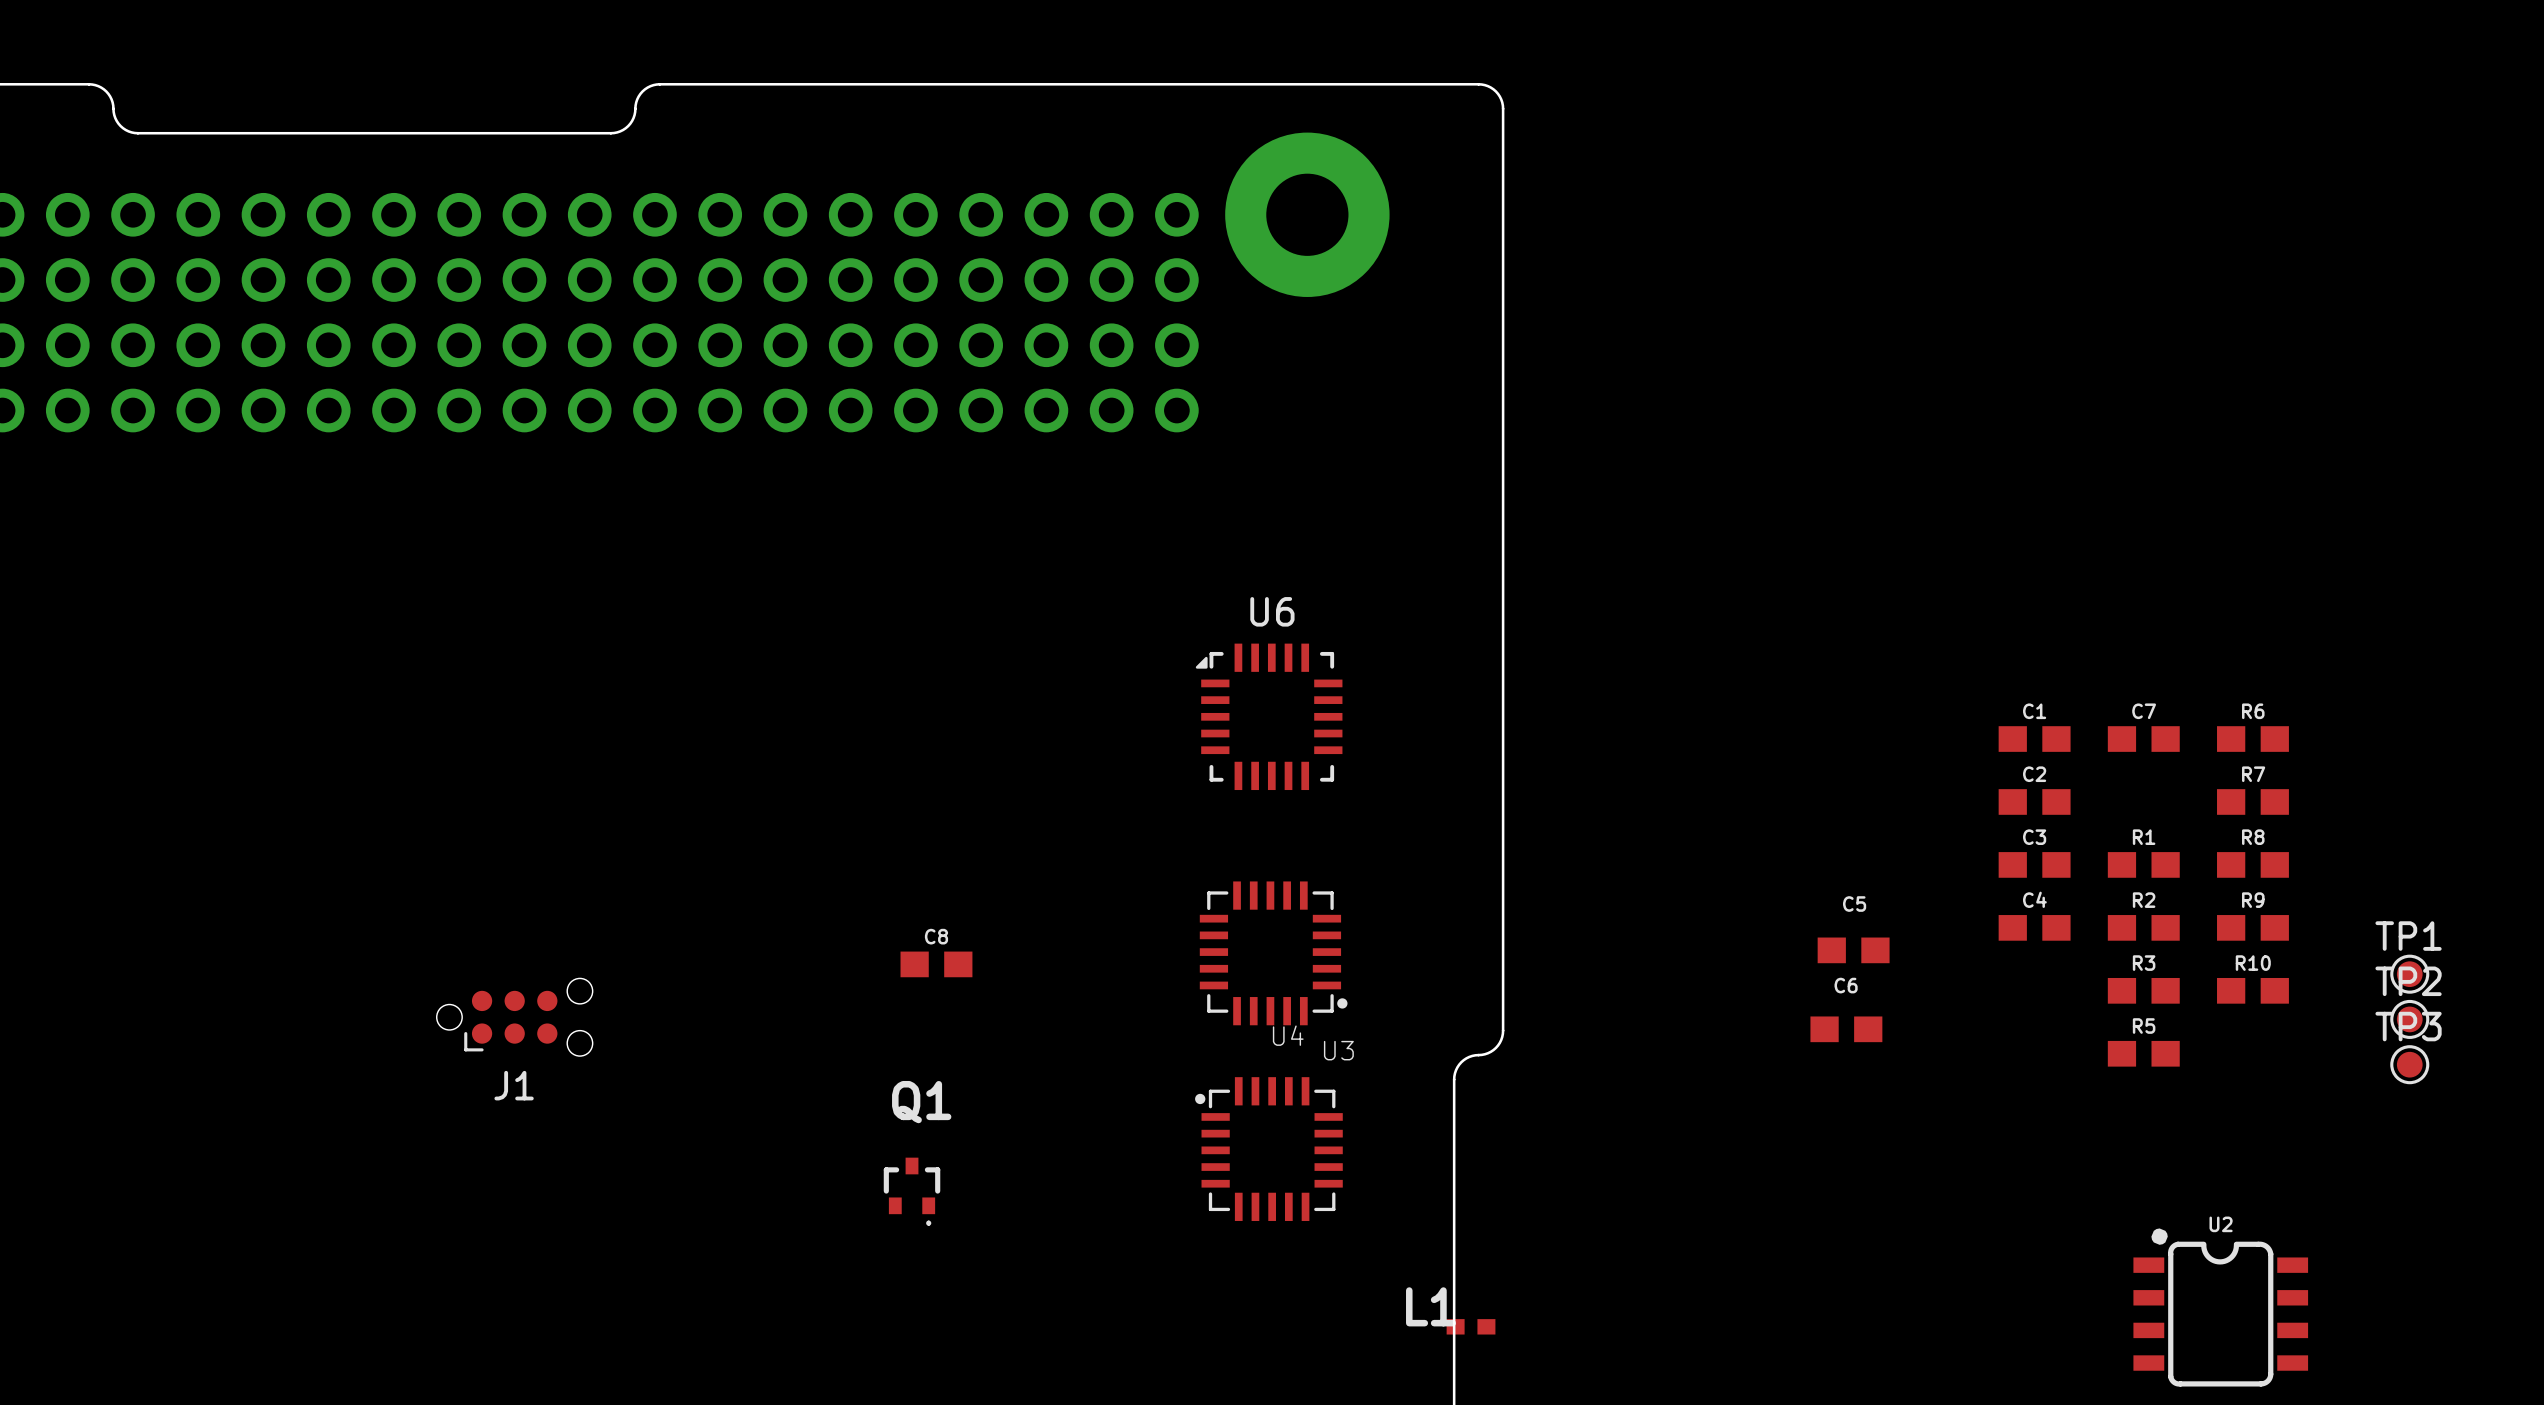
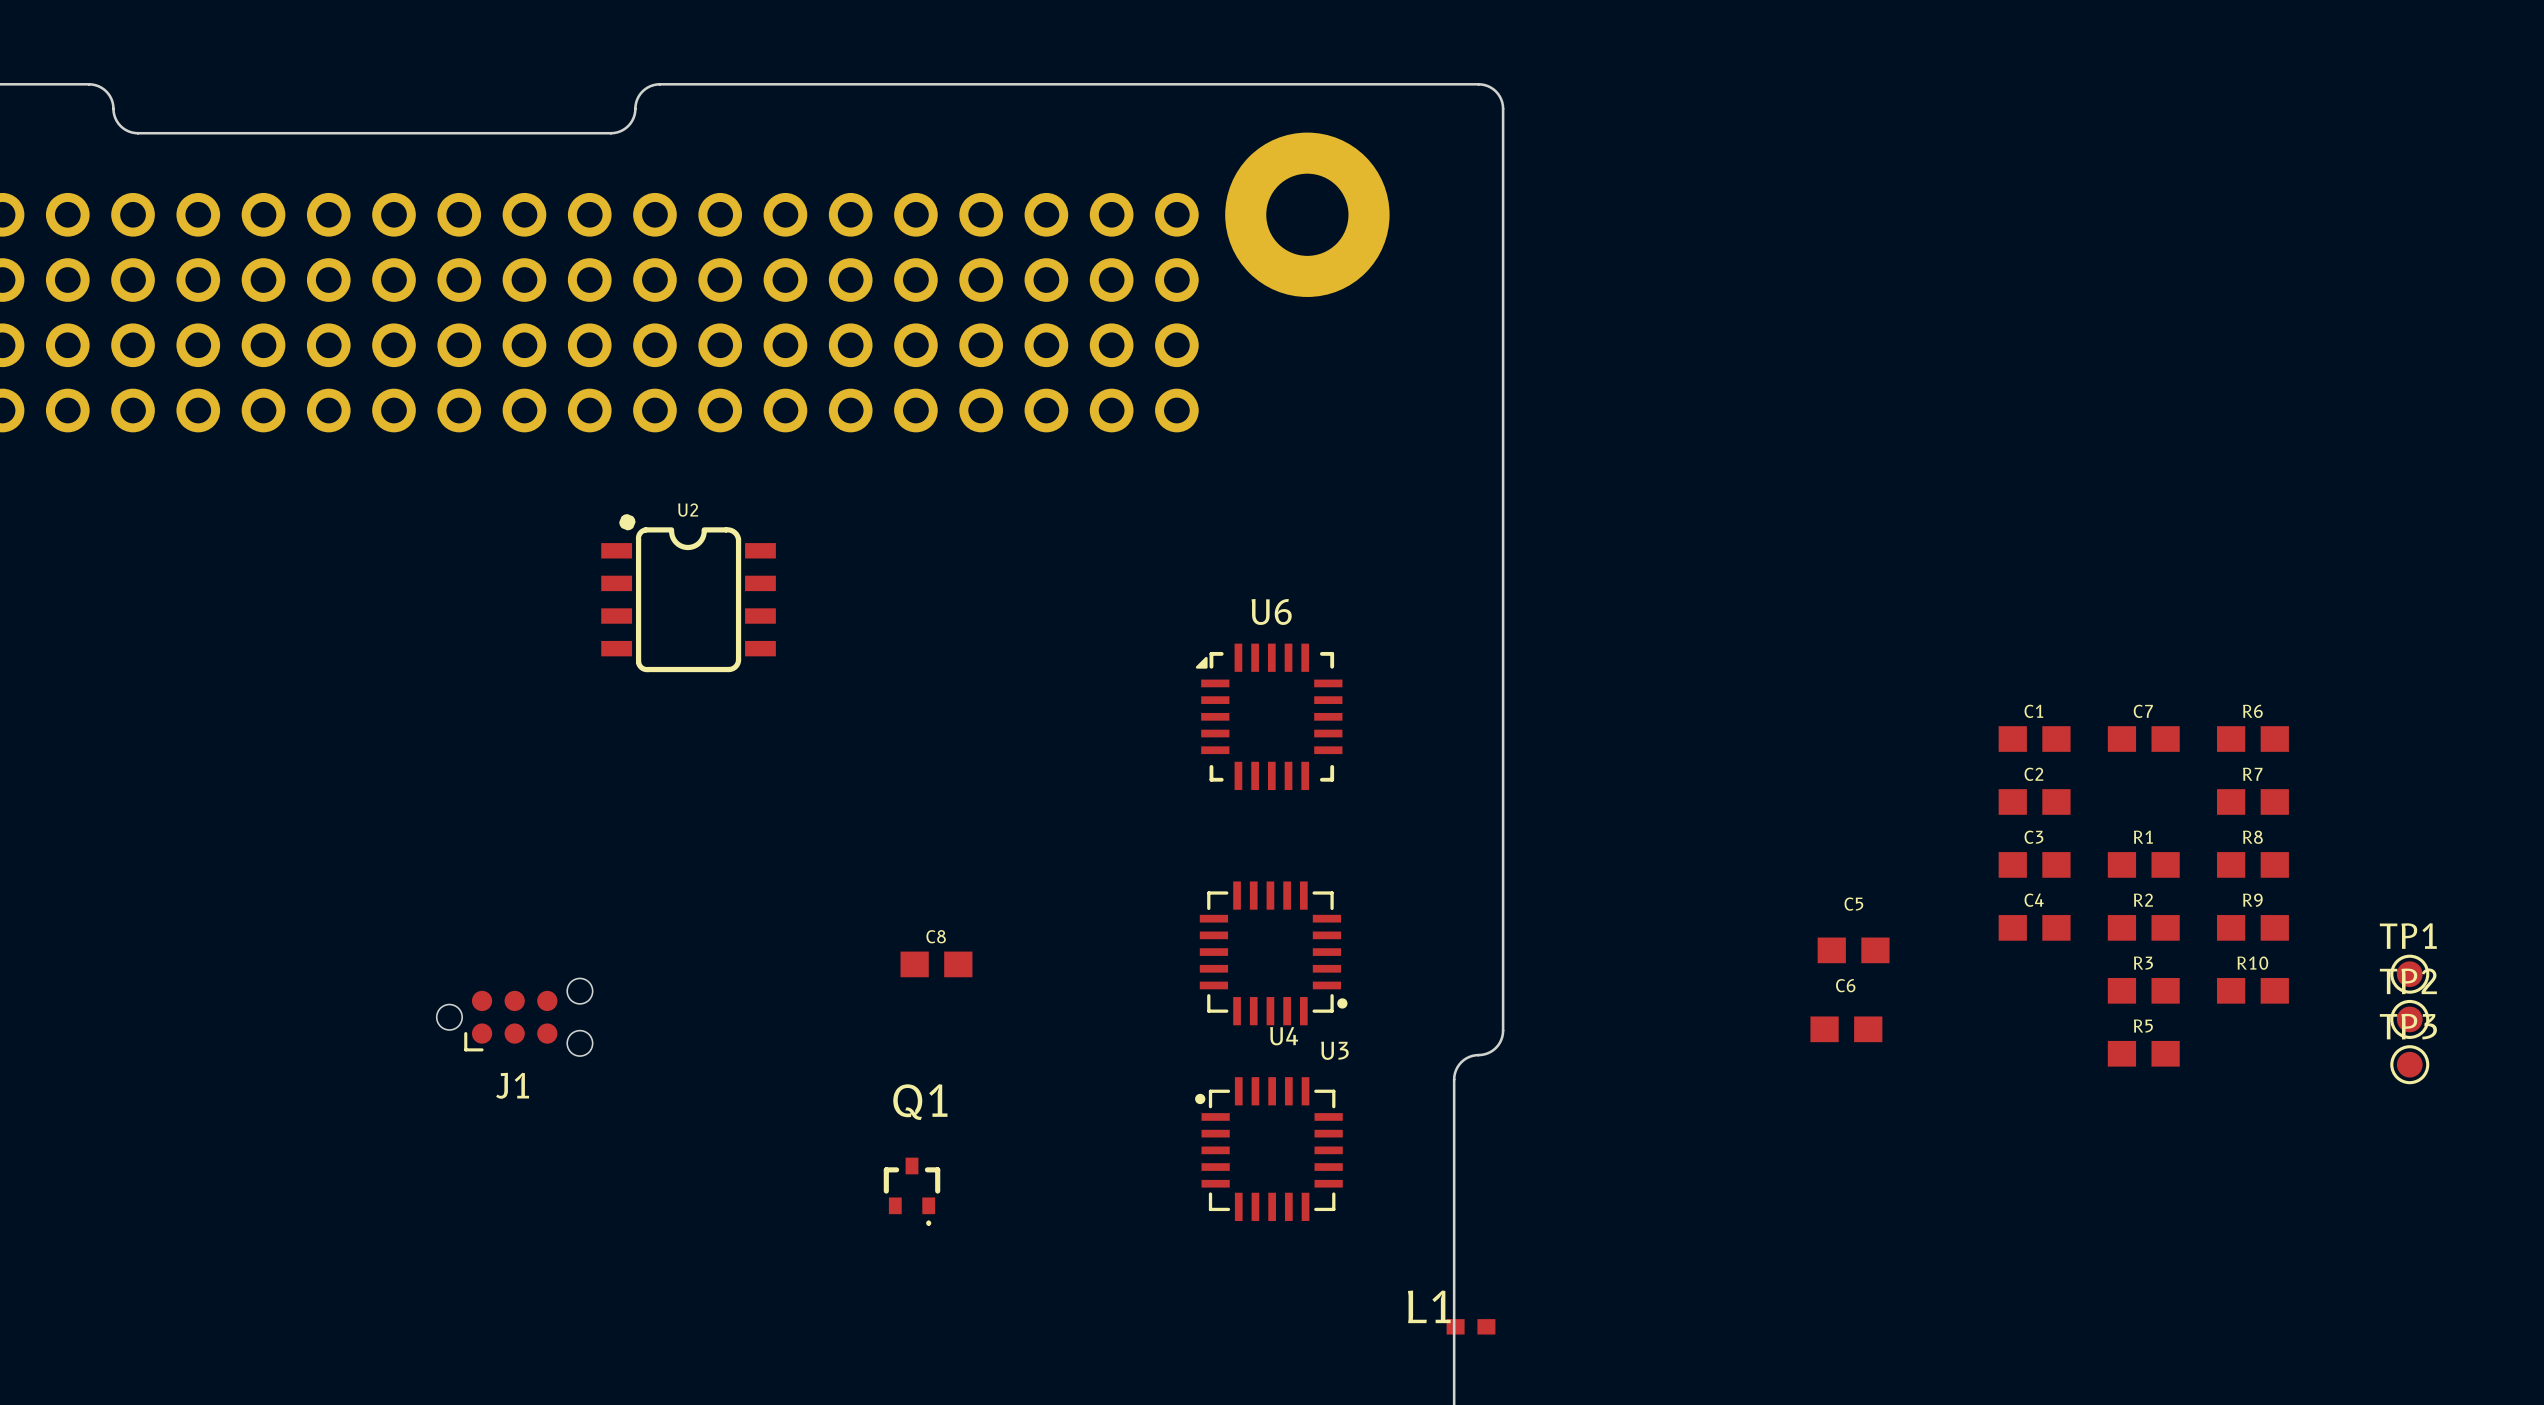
U2 position: (2220, 1307) -> (688, 593)

